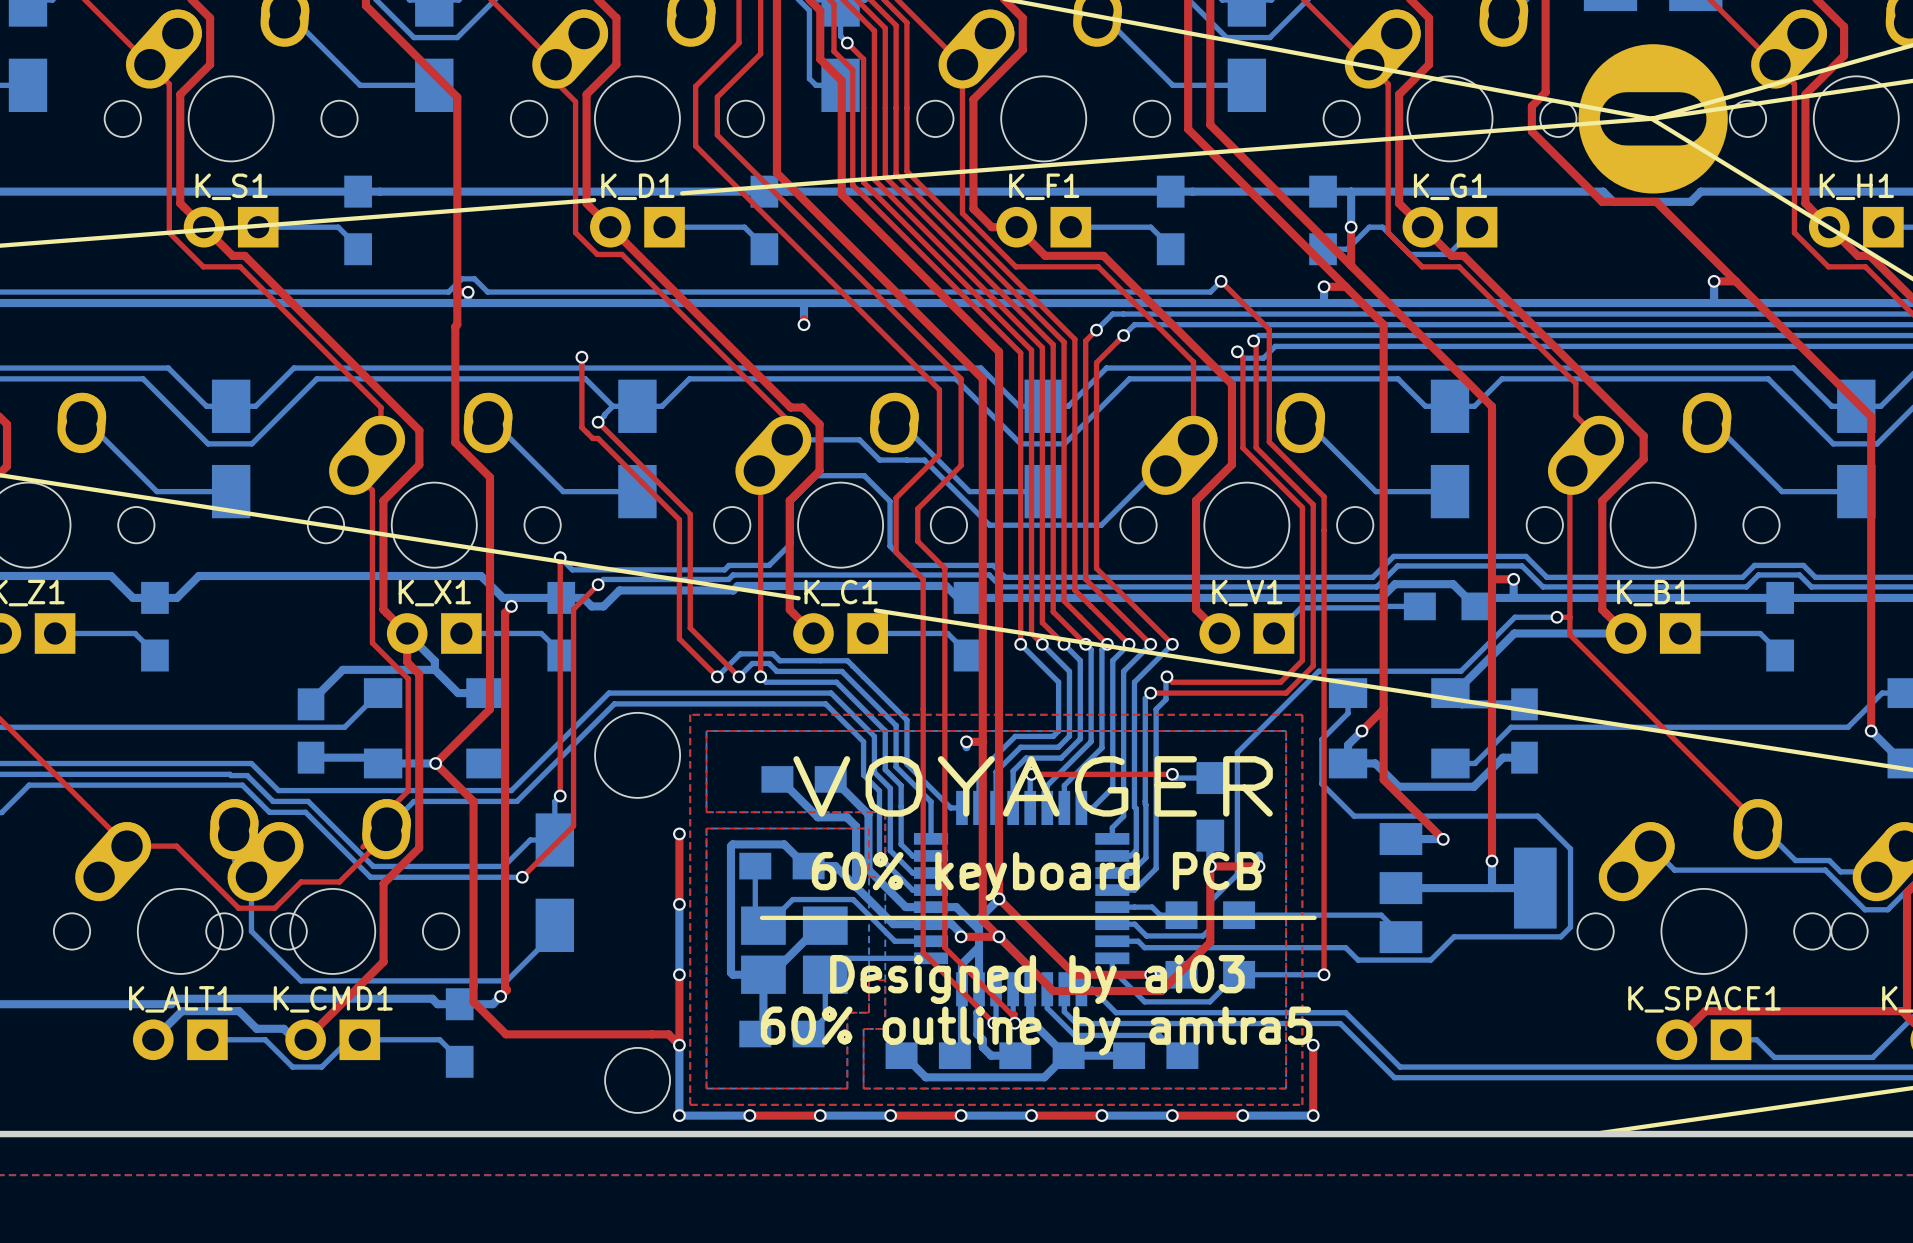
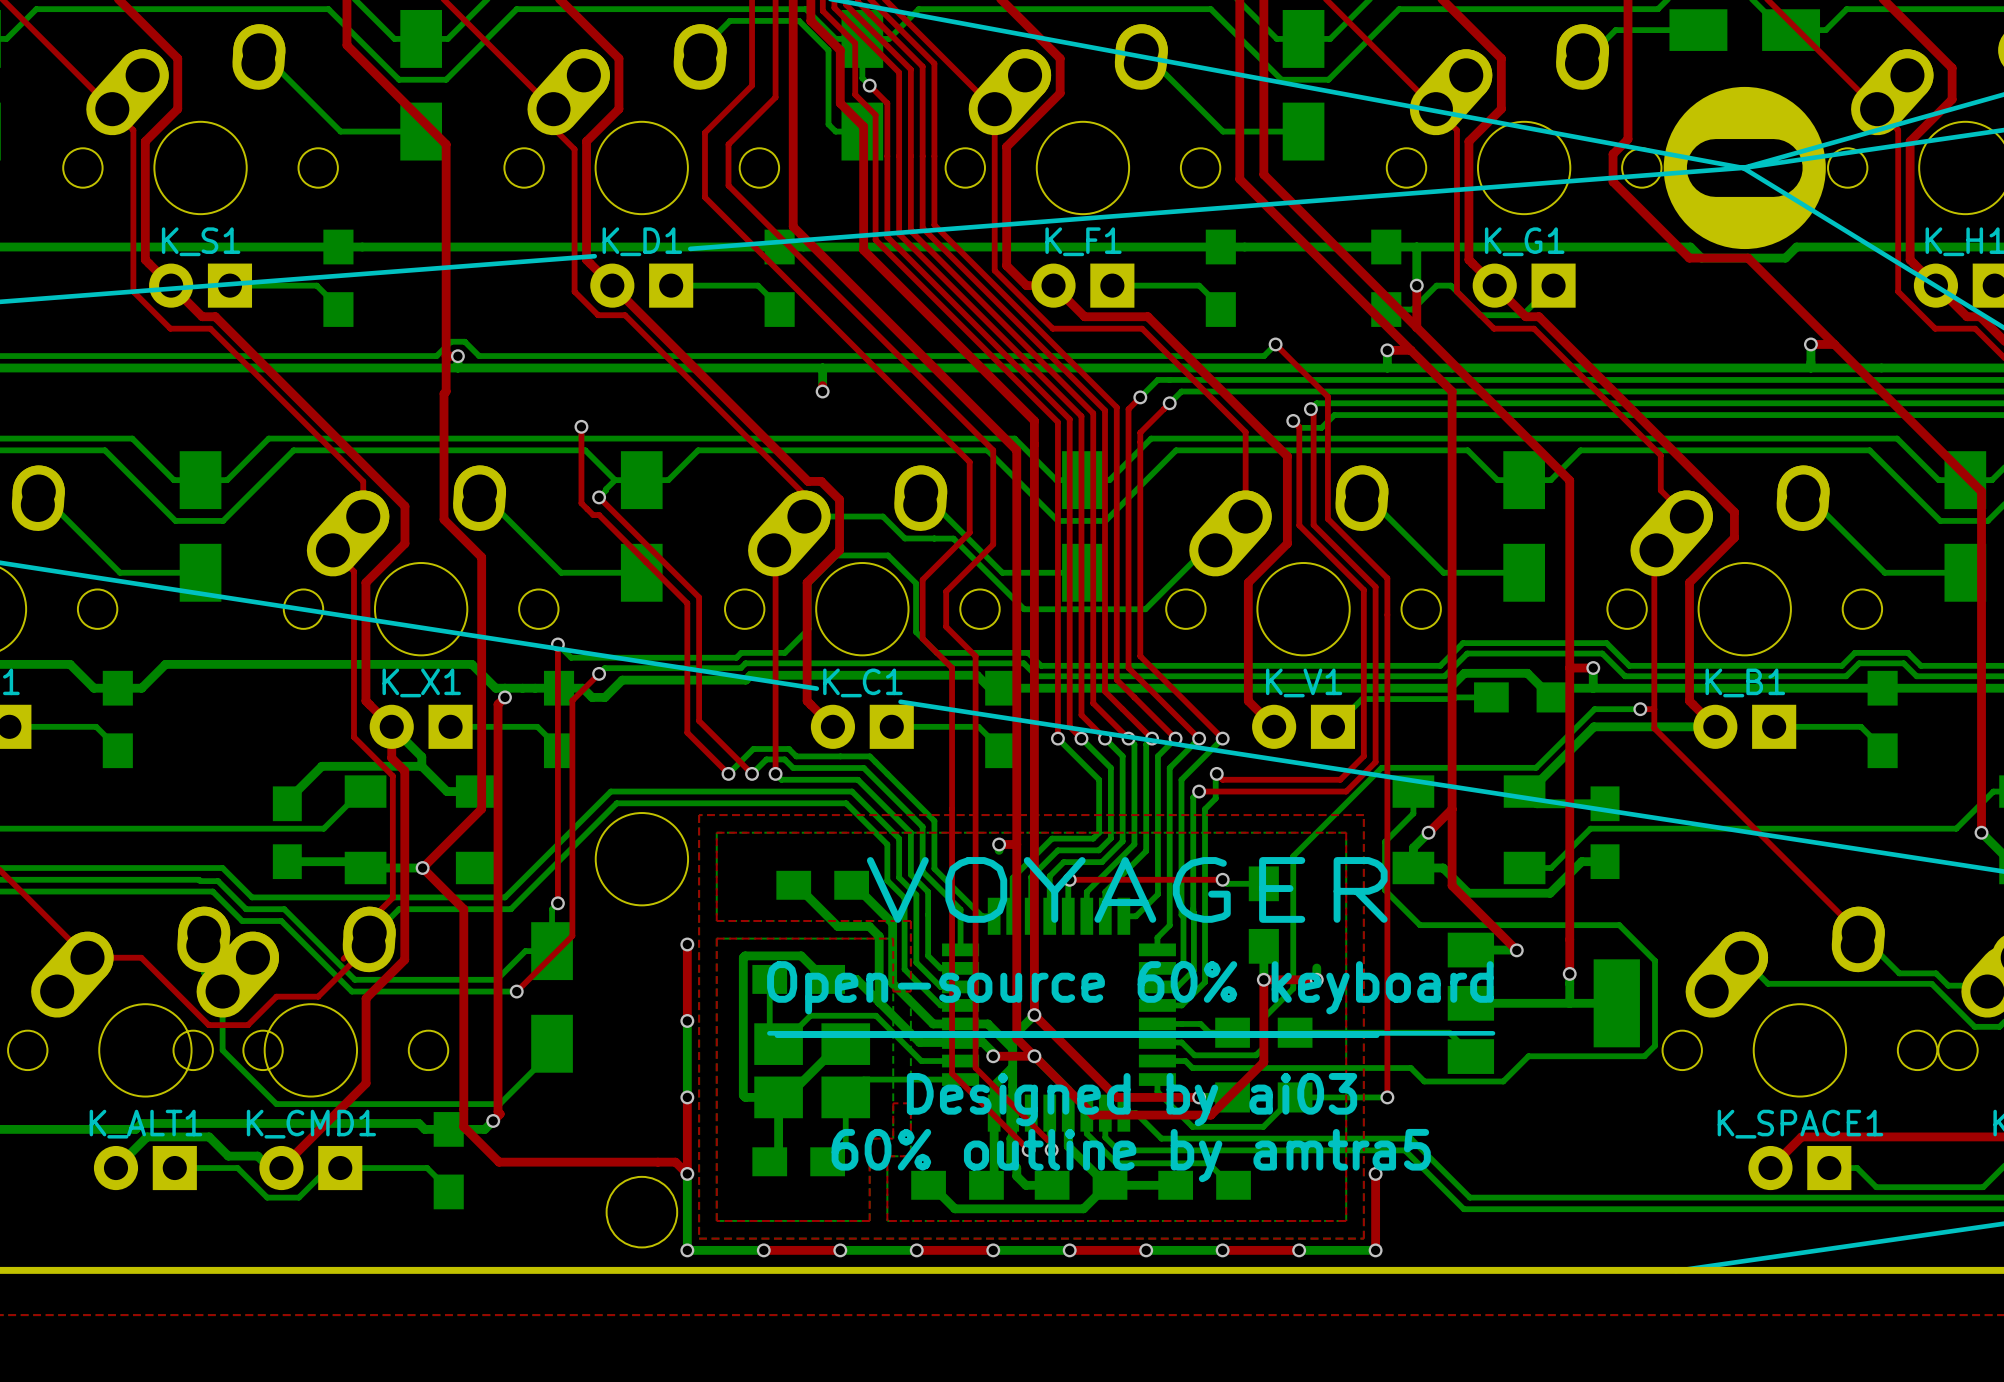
text position: VOYAGER (1033, 786) -> VOYAGER (1127, 889)
text: none -> Open-source 60% keyboard (1130, 987)
text: 60% keyboard PCB (1036, 876) -> none
line: none -> (769, 1033) (1492, 1033)
text position: Designed by ai03 (1037, 979) -> Designed by ai03 (1132, 1099)
text position: 60% outline by amtra5 (1036, 1031) -> 60% outline by amtra5 (1131, 1155)

